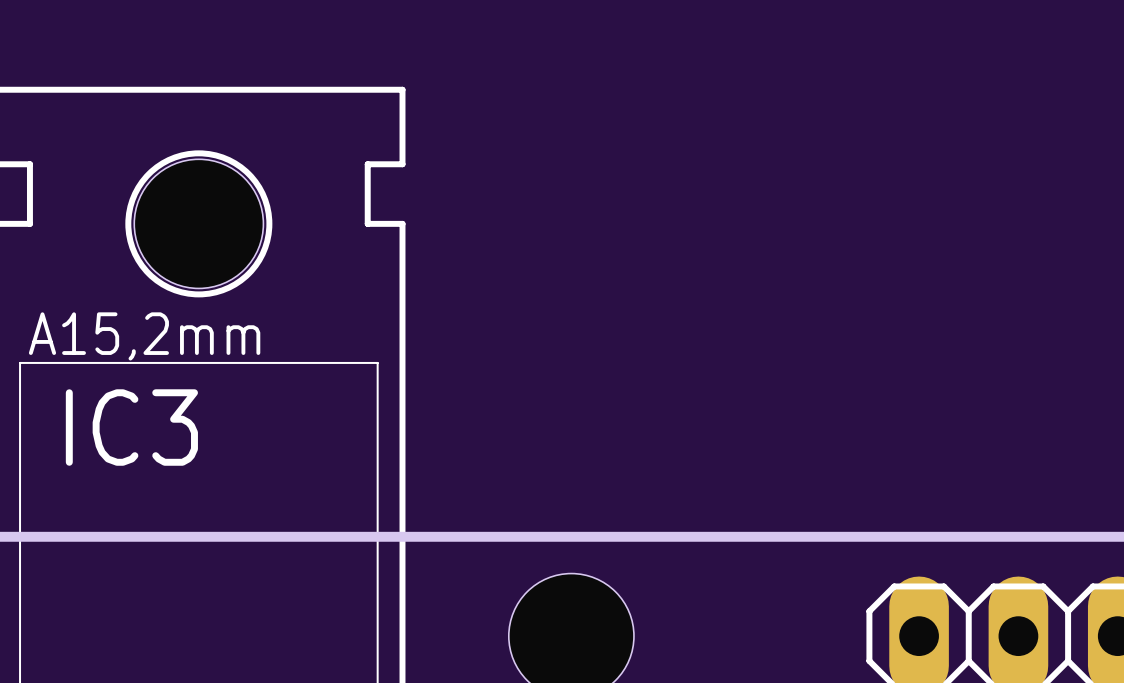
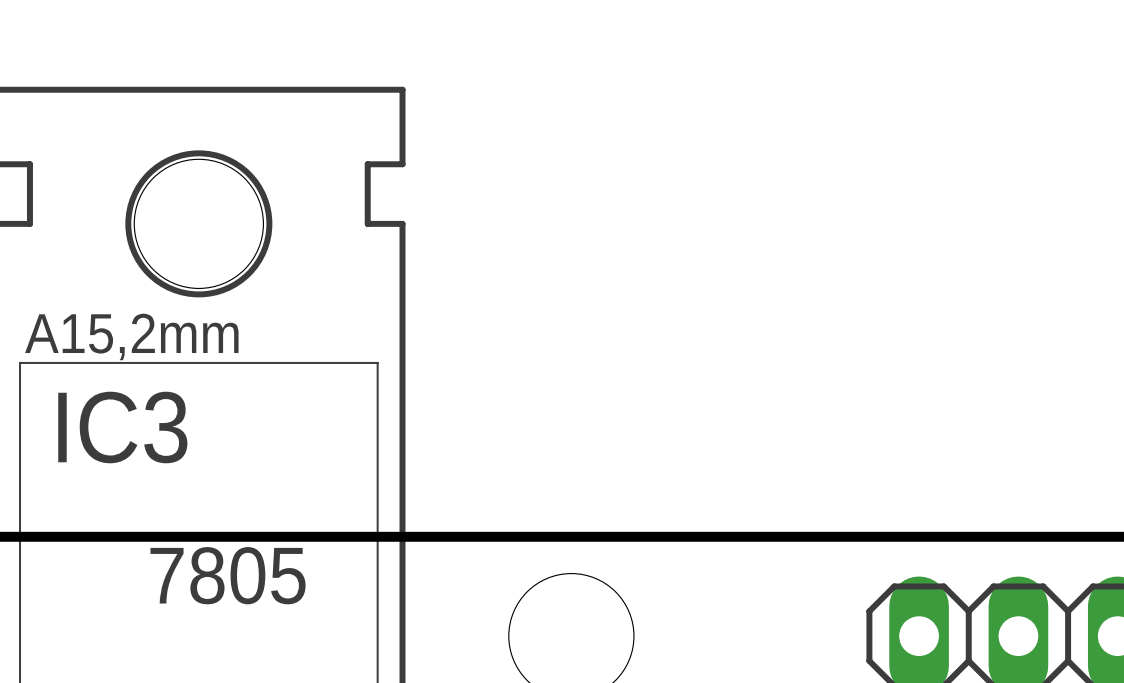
text: none -> 7805 (228, 575)

